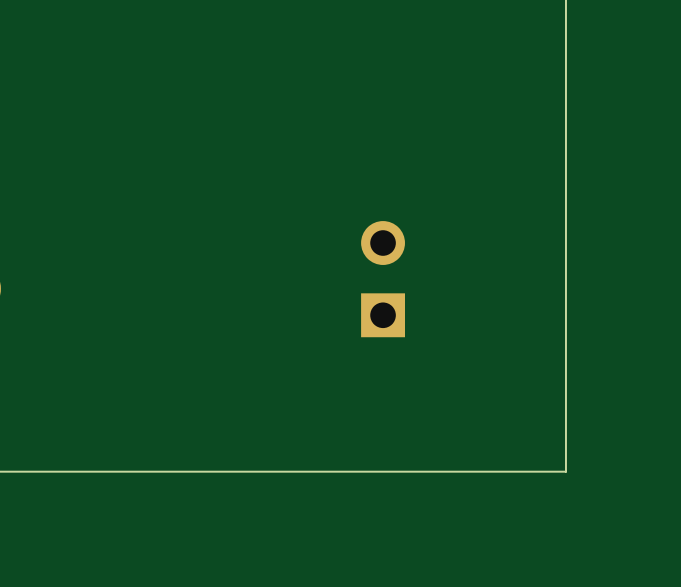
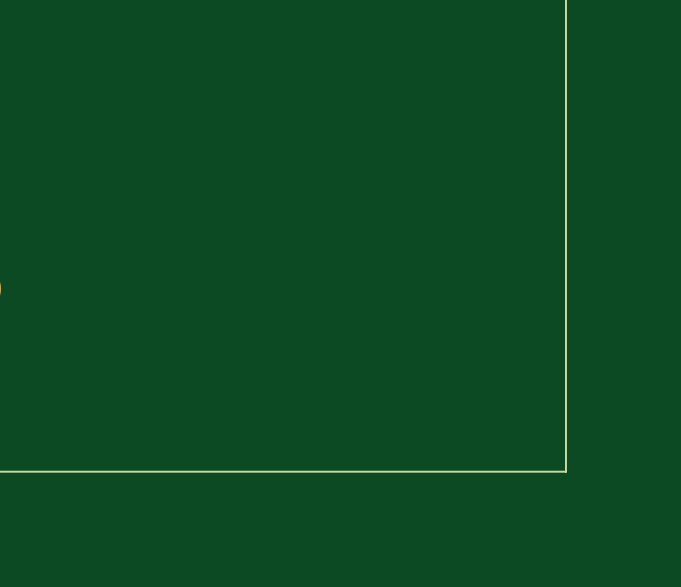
part: (383, 279) -> none

